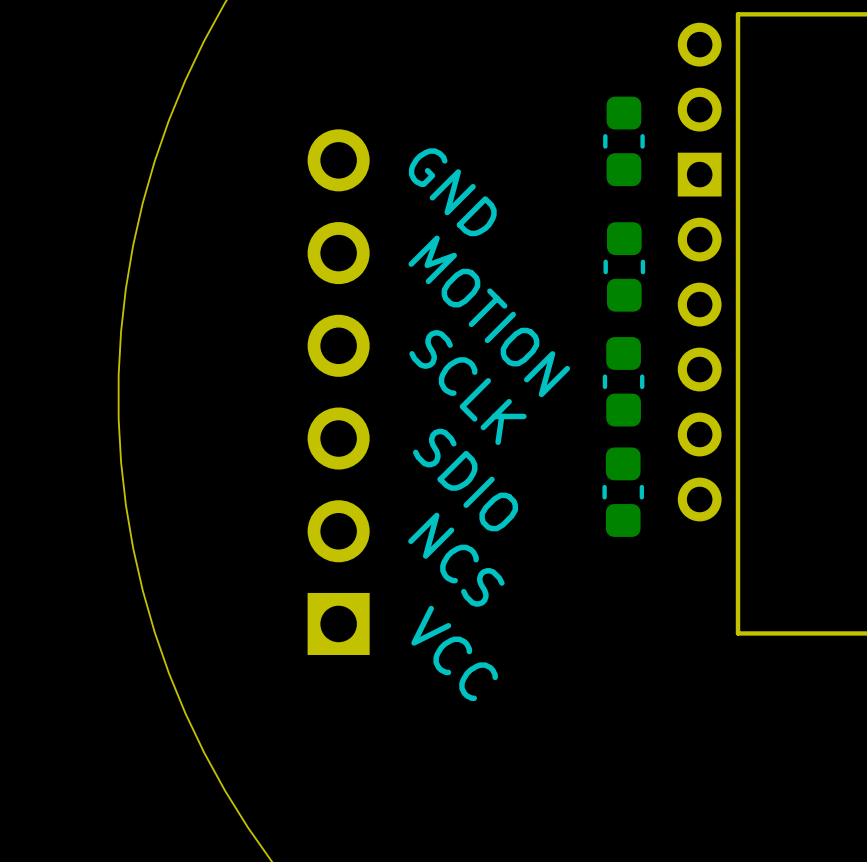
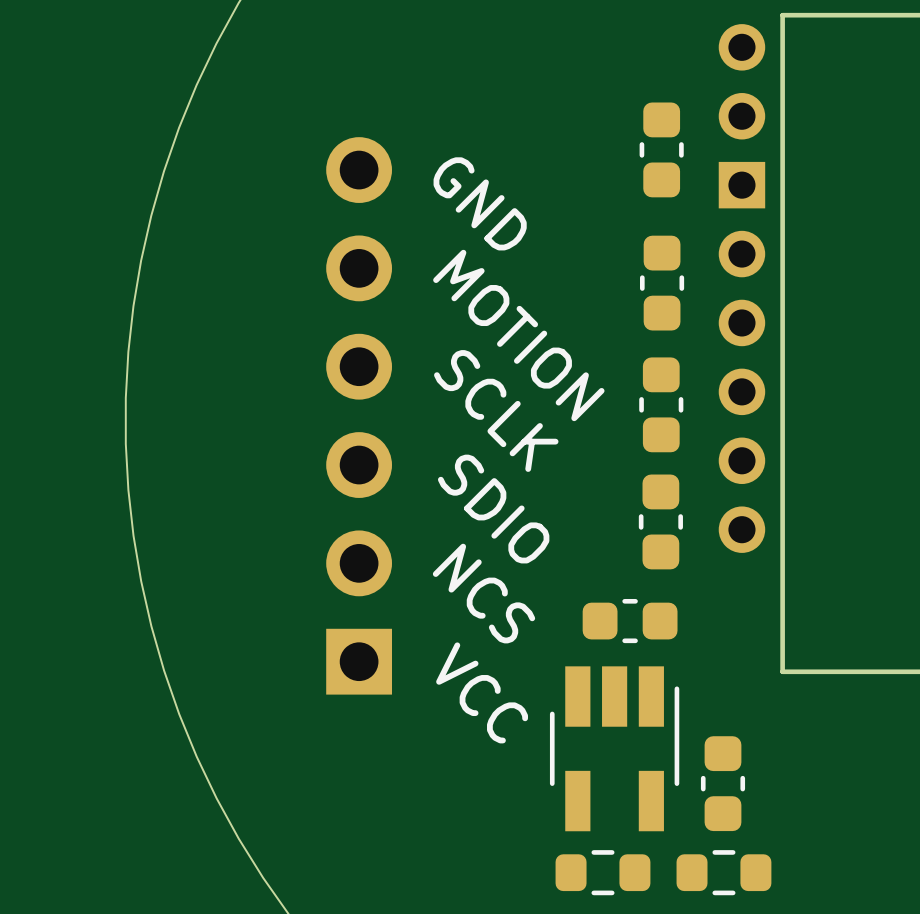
part: none -> (630, 621)
part: none -> (614, 748)
part: none -> (722, 783)
part: none -> (602, 872)
part: none -> (723, 872)

